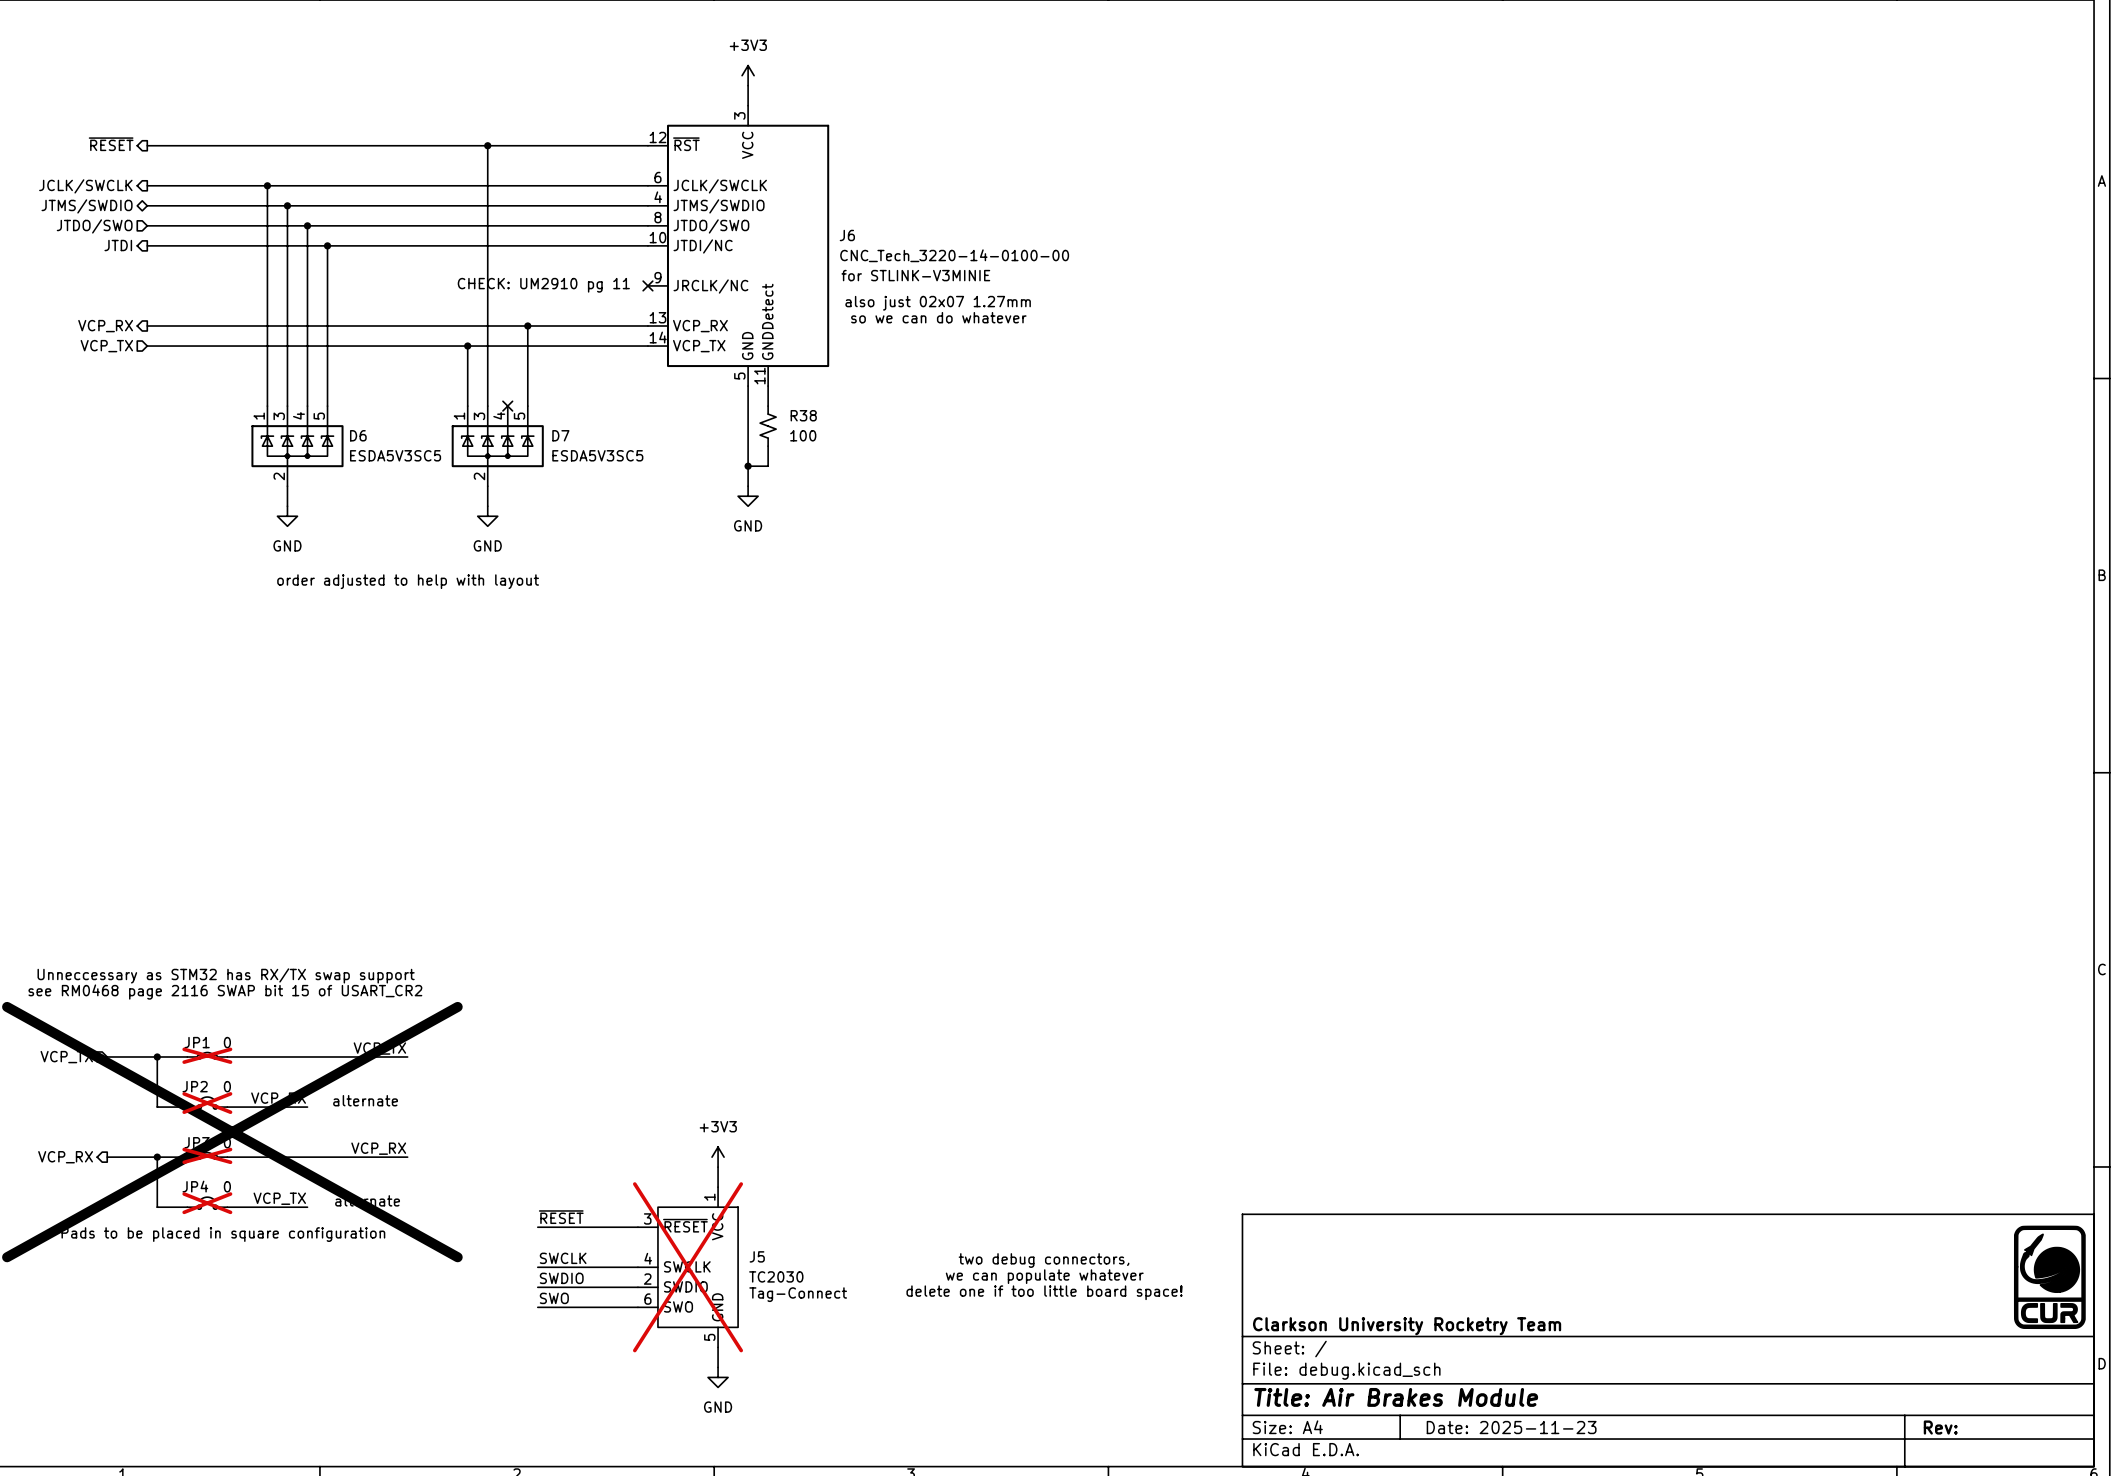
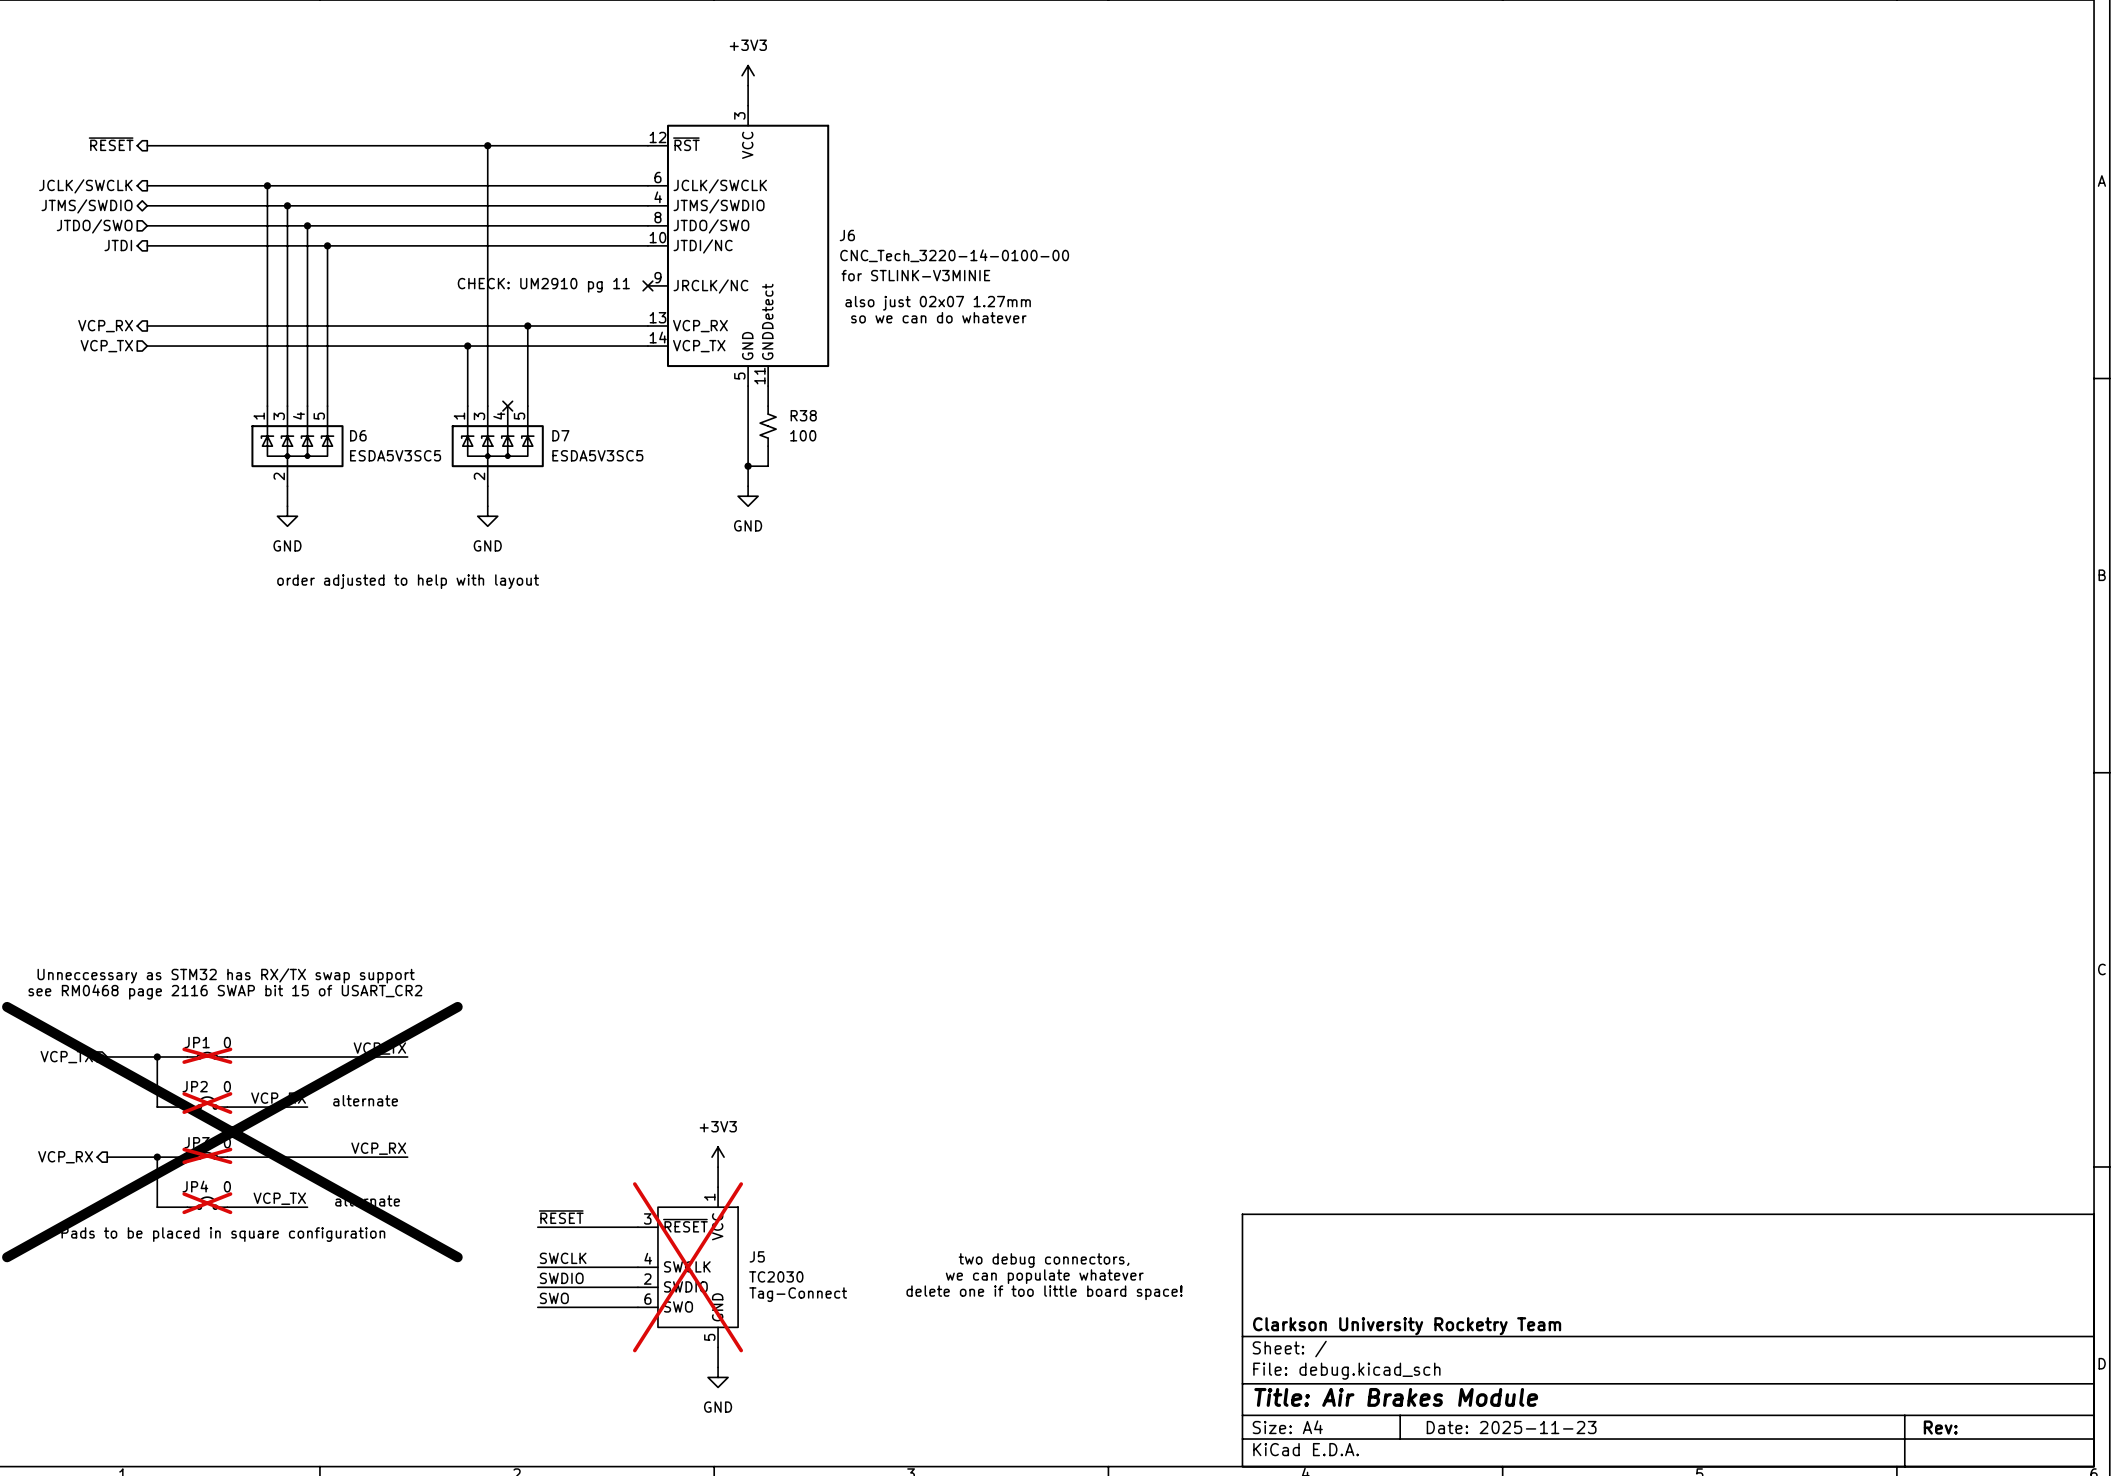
power symbol: (2049, 1277) -> none

